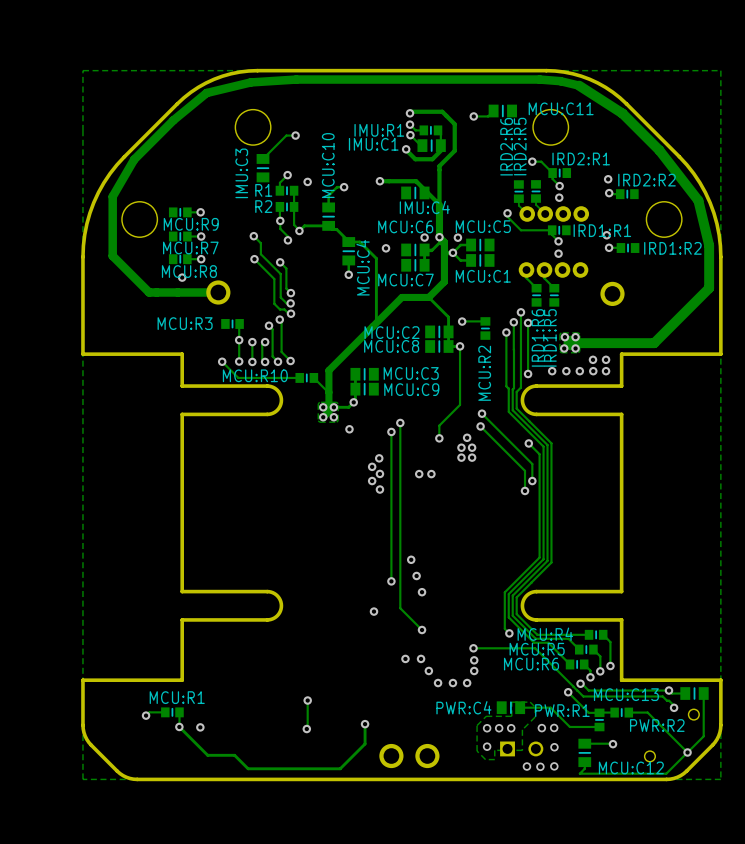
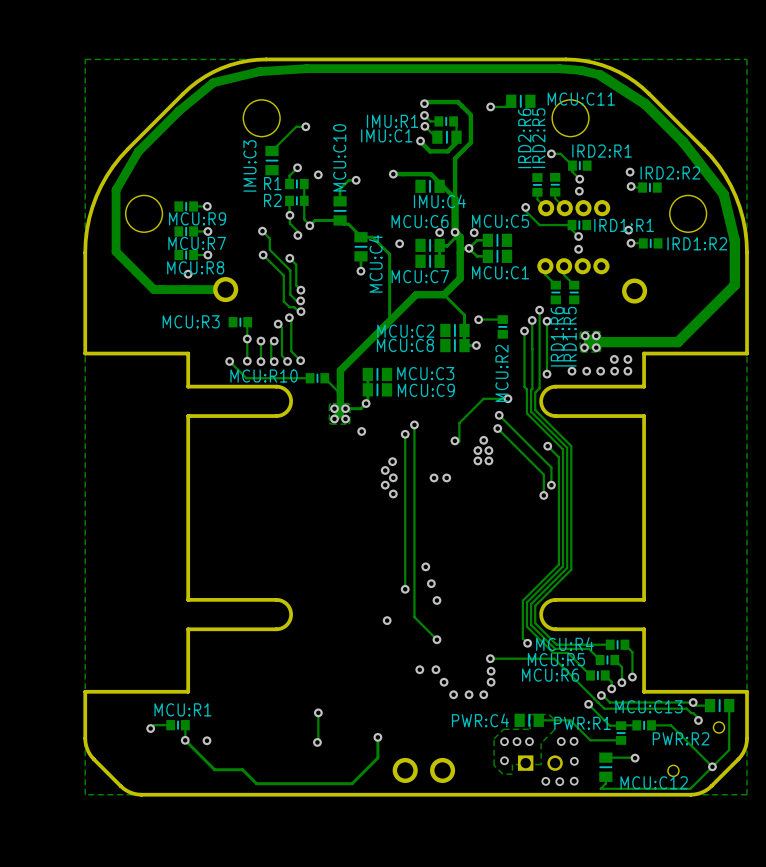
track: (460, 346) (460, 404) (439, 425) (439, 438) -> none
track: none -> (507, 398) (483, 398) (459, 423) (459, 441)
via: none -> (507, 398)

